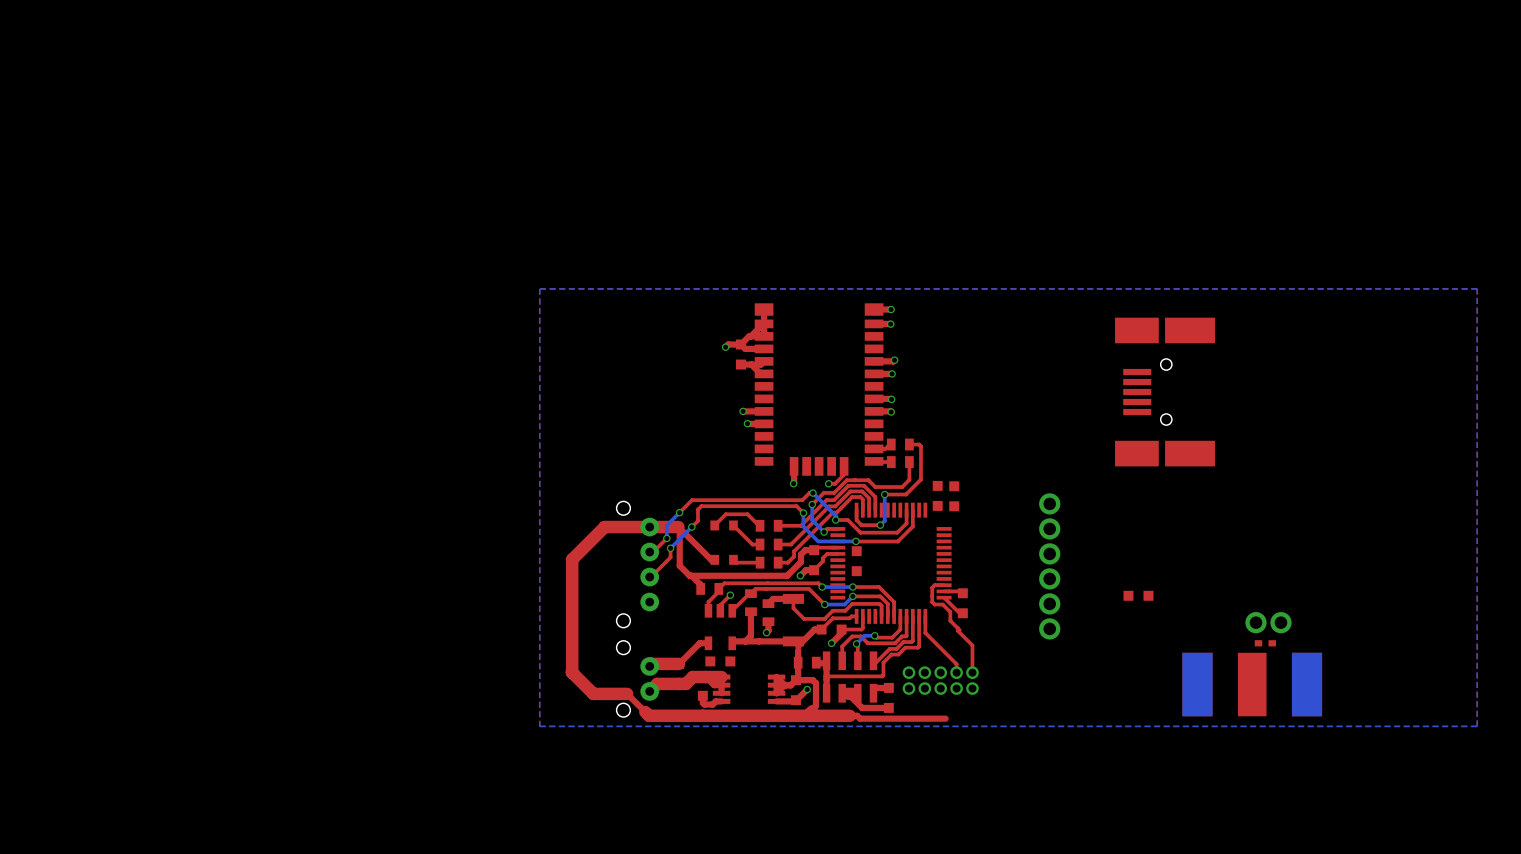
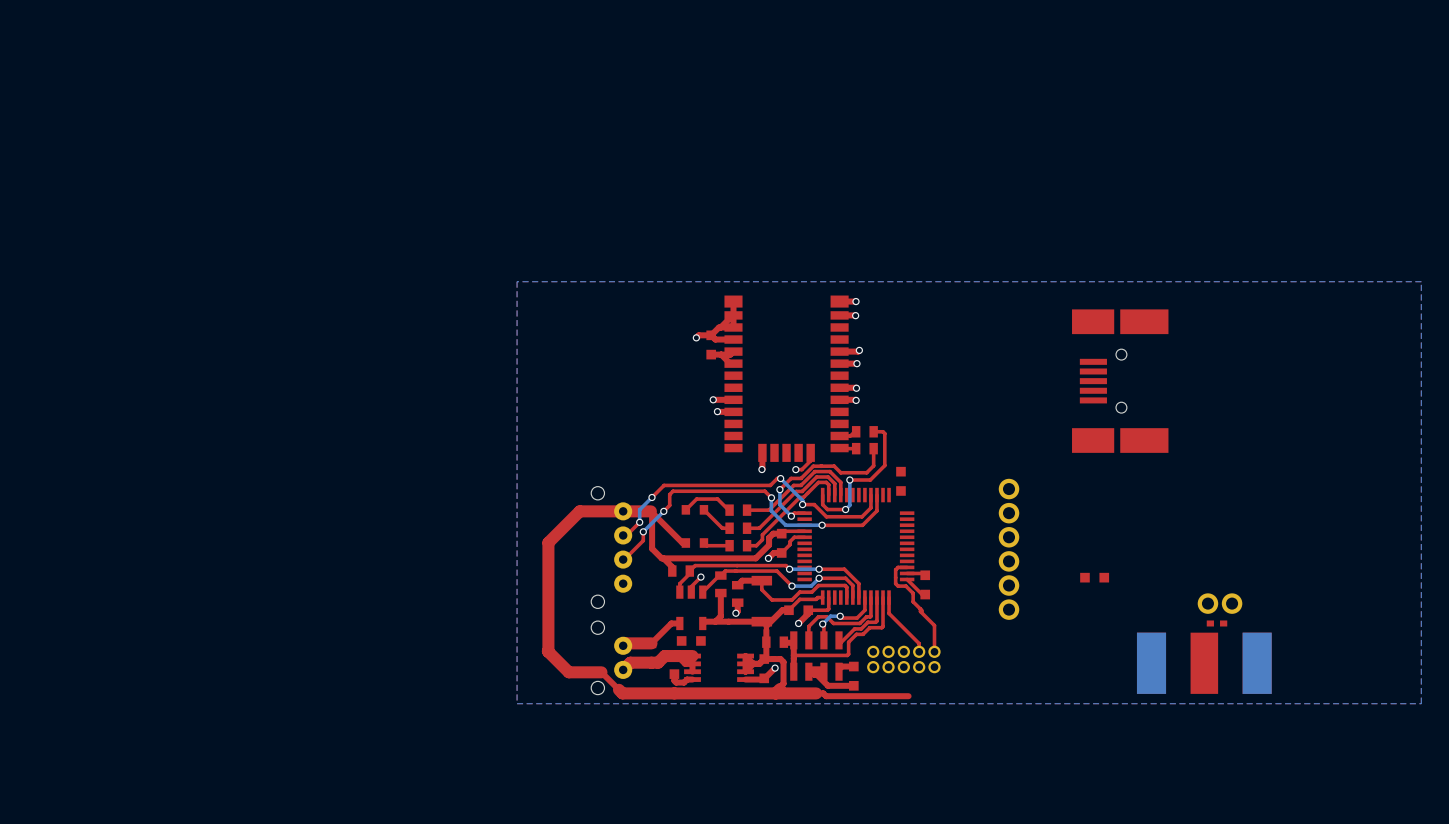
part: (954, 496) -> none
part: (856, 561) -> none

